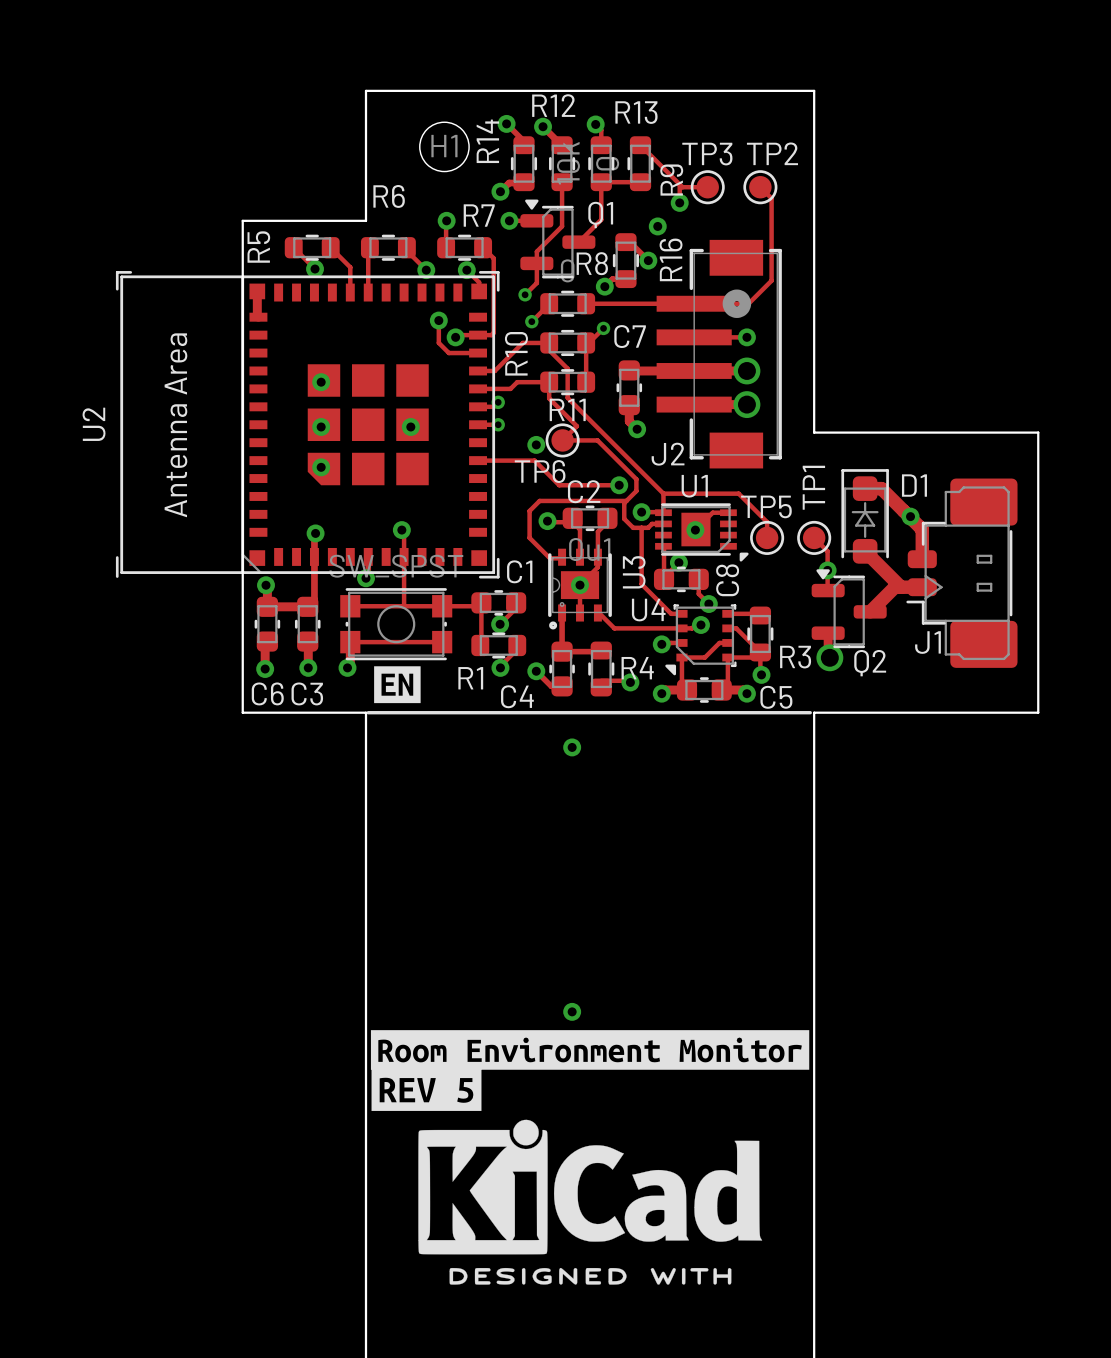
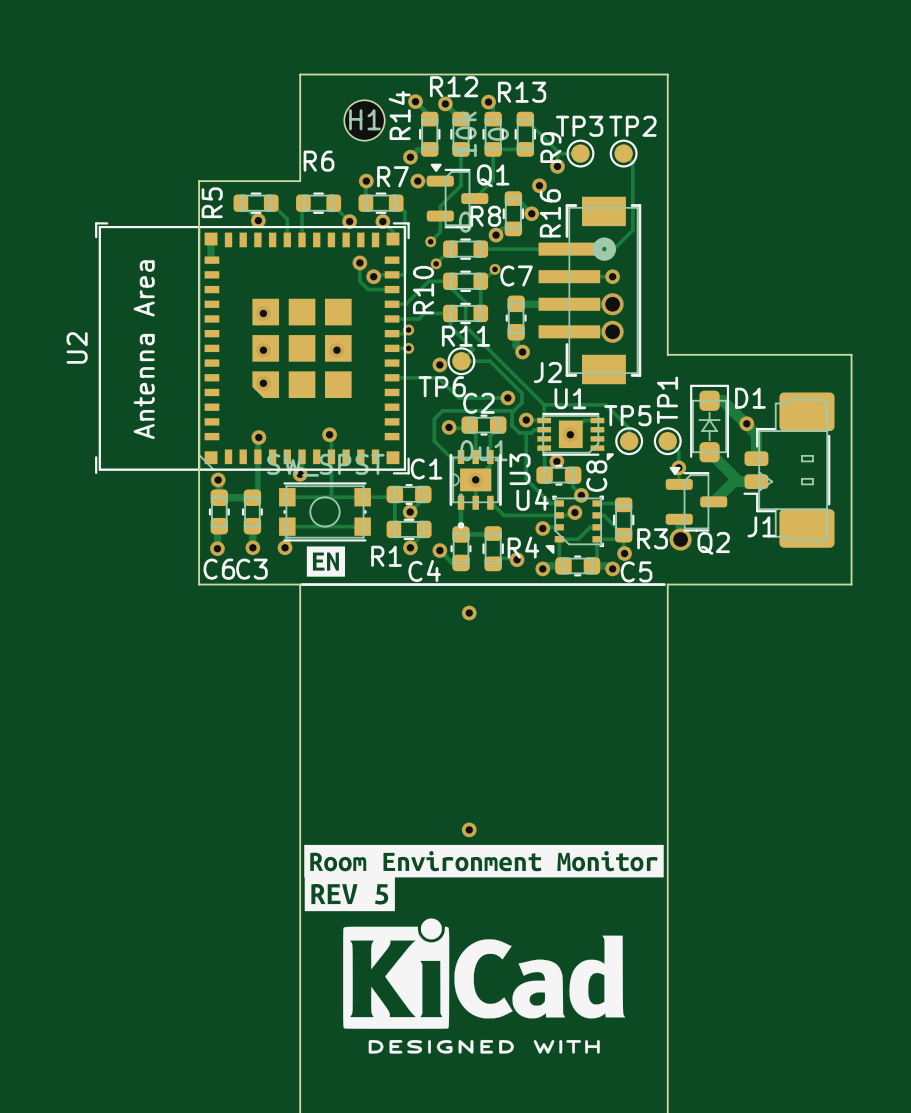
U3 footprint: [548, 548, 612, 630] -> [449, 450, 502, 529]

